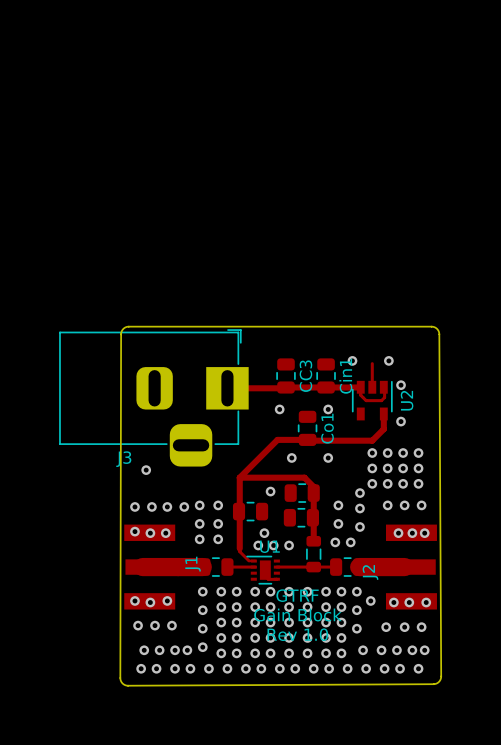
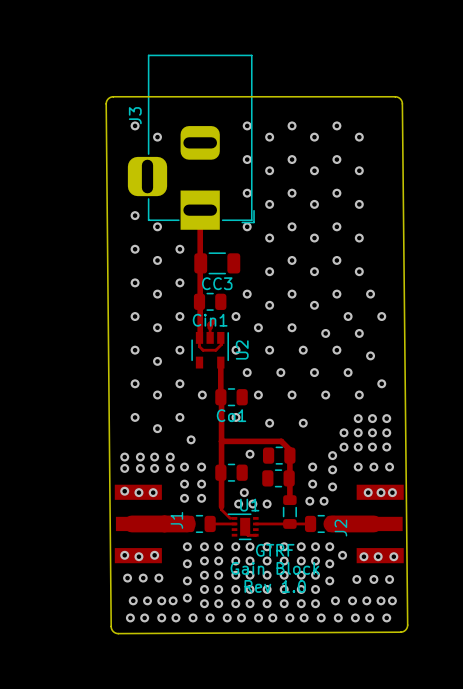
via: none -> (135, 125)
via: none -> (247, 125)
via: none -> (292, 125)
via: none -> (336, 125)
via: none -> (157, 137)
via: none -> (269, 137)
via: none -> (314, 137)
via: none -> (359, 137)
via: none -> (247, 159)
via: none -> (292, 159)
via: none -> (336, 159)
via: none -> (269, 170)
via: none -> (314, 170)
via: none -> (359, 170)
via: none -> (247, 193)
via: none -> (292, 193)
via: none -> (336, 193)
via: none -> (269, 204)
via: none -> (314, 204)
via: none -> (359, 204)
track: none -> (200, 210) (198, 338)
via: none -> (135, 215)
via: none -> (157, 226)
via: none -> (247, 226)
via: none -> (292, 226)
via: none -> (336, 226)
via: none -> (269, 238)
via: none -> (314, 238)
via: none -> (359, 238)
via: none -> (135, 249)
via: none -> (179, 249)
via: none -> (157, 260)
via: none -> (292, 260)
via: none -> (336, 260)
via: none -> (269, 271)
via: none -> (314, 271)
via: none -> (359, 271)
via: none -> (135, 282)
via: none -> (179, 282)
via: none -> (157, 294)
via: none -> (247, 294)
via: none -> (292, 294)
via: none -> (336, 294)
via: none -> (370, 294)
via: none -> (269, 305)
via: none -> (314, 305)
via: none -> (135, 316)
via: none -> (179, 316)
via: none -> (235, 316)
via: none -> (348, 316)
via: none -> (381, 316)
track: none -> (213, 321) (210, 324) (210, 337)
via: none -> (157, 327)
via: none -> (258, 327)
via: none -> (292, 327)
CC3 footprint: [276, 358, 296, 394] -> [194, 252, 241, 275]
track: none -> (221, 336) (221, 344) (215, 350) (203, 350) (199, 346) (199, 337)
track: (372, 363) (372, 387) -> none
Cin1 rotation: 0° (326, 375) -> 90° clockwise (210, 301)
Cin1 position: (326, 375) -> (210, 301)
CC3 name position: CC3 (305, 376) -> CC3 (217, 283)
via: none -> (135, 350)
via: none -> (179, 350)
via: none -> (235, 350)
via: none -> (269, 350)
via: none -> (303, 350)
via: none -> (336, 350)
track: (384, 385) (384, 397) (381, 400) (366, 400) (360, 395) (360, 387) -> none
track: (286, 387) (326, 388) -> none
track: (326, 387) (359, 388) -> none
track: (236, 388) (292, 388) -> none
via: none -> (157, 361)
J3 rotation: 0° (153, 397) -> 90° clockwise (191, 142)
J3 position: (153, 397) -> (191, 142)
U2 position: (372, 400) -> (210, 350)
via: none -> (247, 372)
via: none -> (280, 372)
via: none -> (314, 372)
via: none -> (348, 372)
via: (279, 409) -> none
via: (328, 409) -> none
track: (383, 413) (383, 429) (372, 440) (301, 440) -> none
via: none -> (135, 383)
via: none -> (179, 383)
via: none -> (381, 383)
via: (401, 421) -> none
via: none -> (157, 395)
via: none -> (202, 395)
via: none -> (258, 395)
via: none -> (292, 395)
via: none -> (325, 395)
via: none -> (359, 395)
Co1 rotation: 0° (307, 428) -> 90° clockwise (231, 397)
Co1 position: (307, 428) -> (231, 397)
track: (307, 439) (277, 439) (239, 477) -> (220, 362) (221, 441)
via: none -> (135, 417)
via: none -> (179, 417)
via: none -> (235, 417)
via: (372, 453) -> none
via: none -> (157, 428)
via: (146, 470) -> none
via: none -> (191, 439)
via: none -> (124, 457)
via: none -> (140, 457)
via: none -> (154, 457)
via: none -> (170, 457)
board edge: (441, 676) (439, 334) (437, 328) (431, 326) (128, 326) (123, 328) (121, 334) (120, 678) -> (407, 625) (401, 100) (395, 96) (113, 96) (108, 98) (106, 103) (111, 626)

